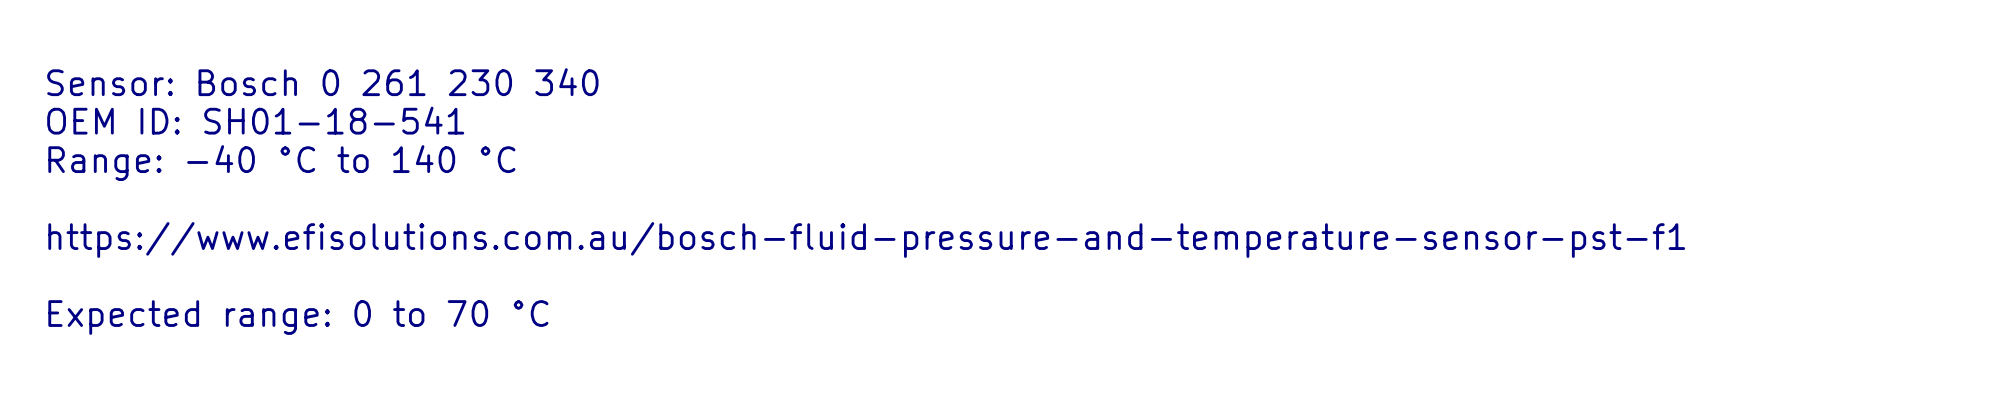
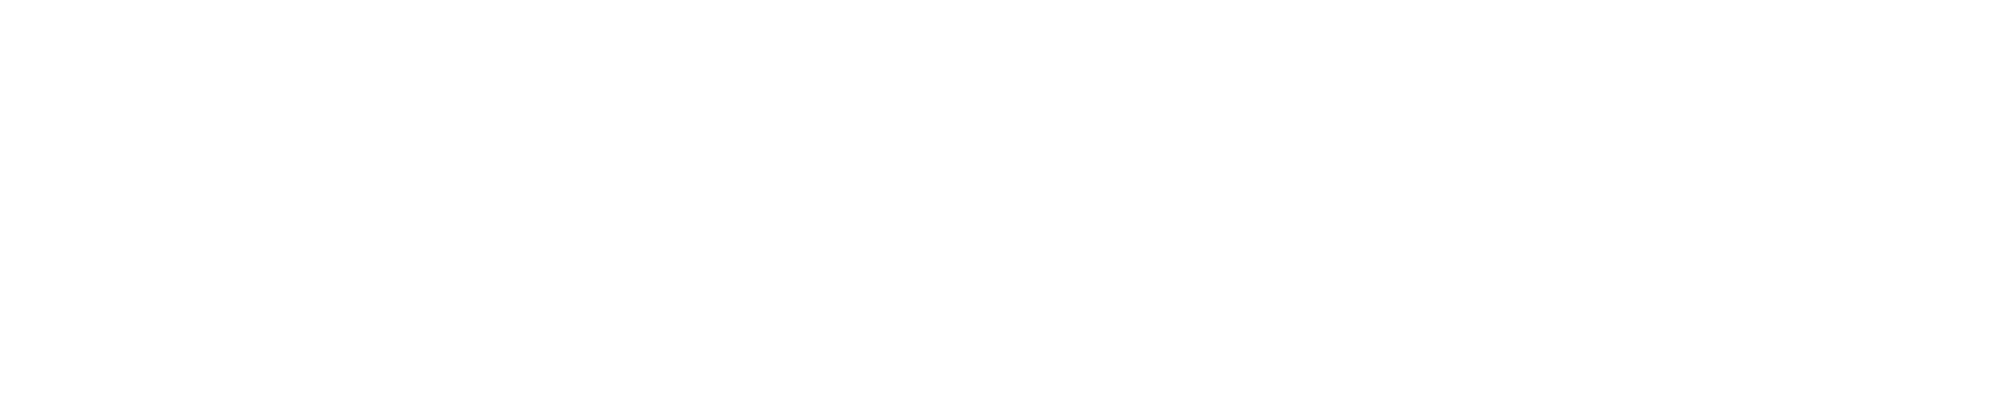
text: Sensor: Bosch 0 261 230 340 (322, 82) -> none
text: OEM ID: SH01-18-541 (255, 120) -> none
text: Range: -40 °C to 140 °C (281, 163) -> none
text: https://www.efisolutions.com.au/bosch-fluid-pressure-and-temperature-sensor-pst-f1 (866, 240) -> none
text: Expected range: 0 to 70 °C (298, 317) -> none

